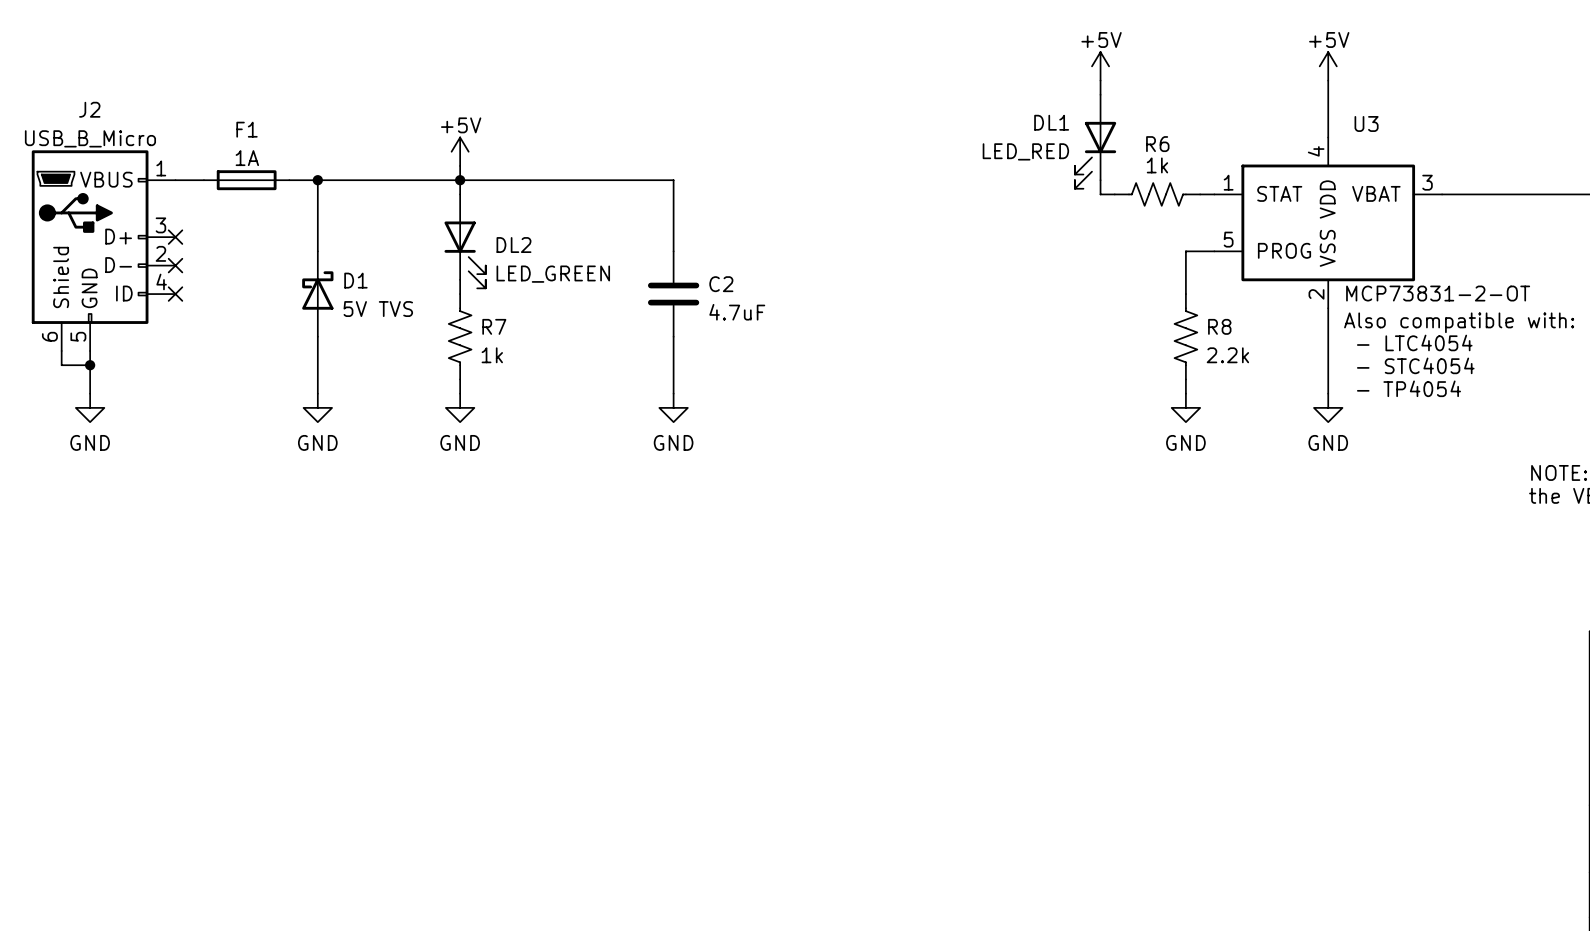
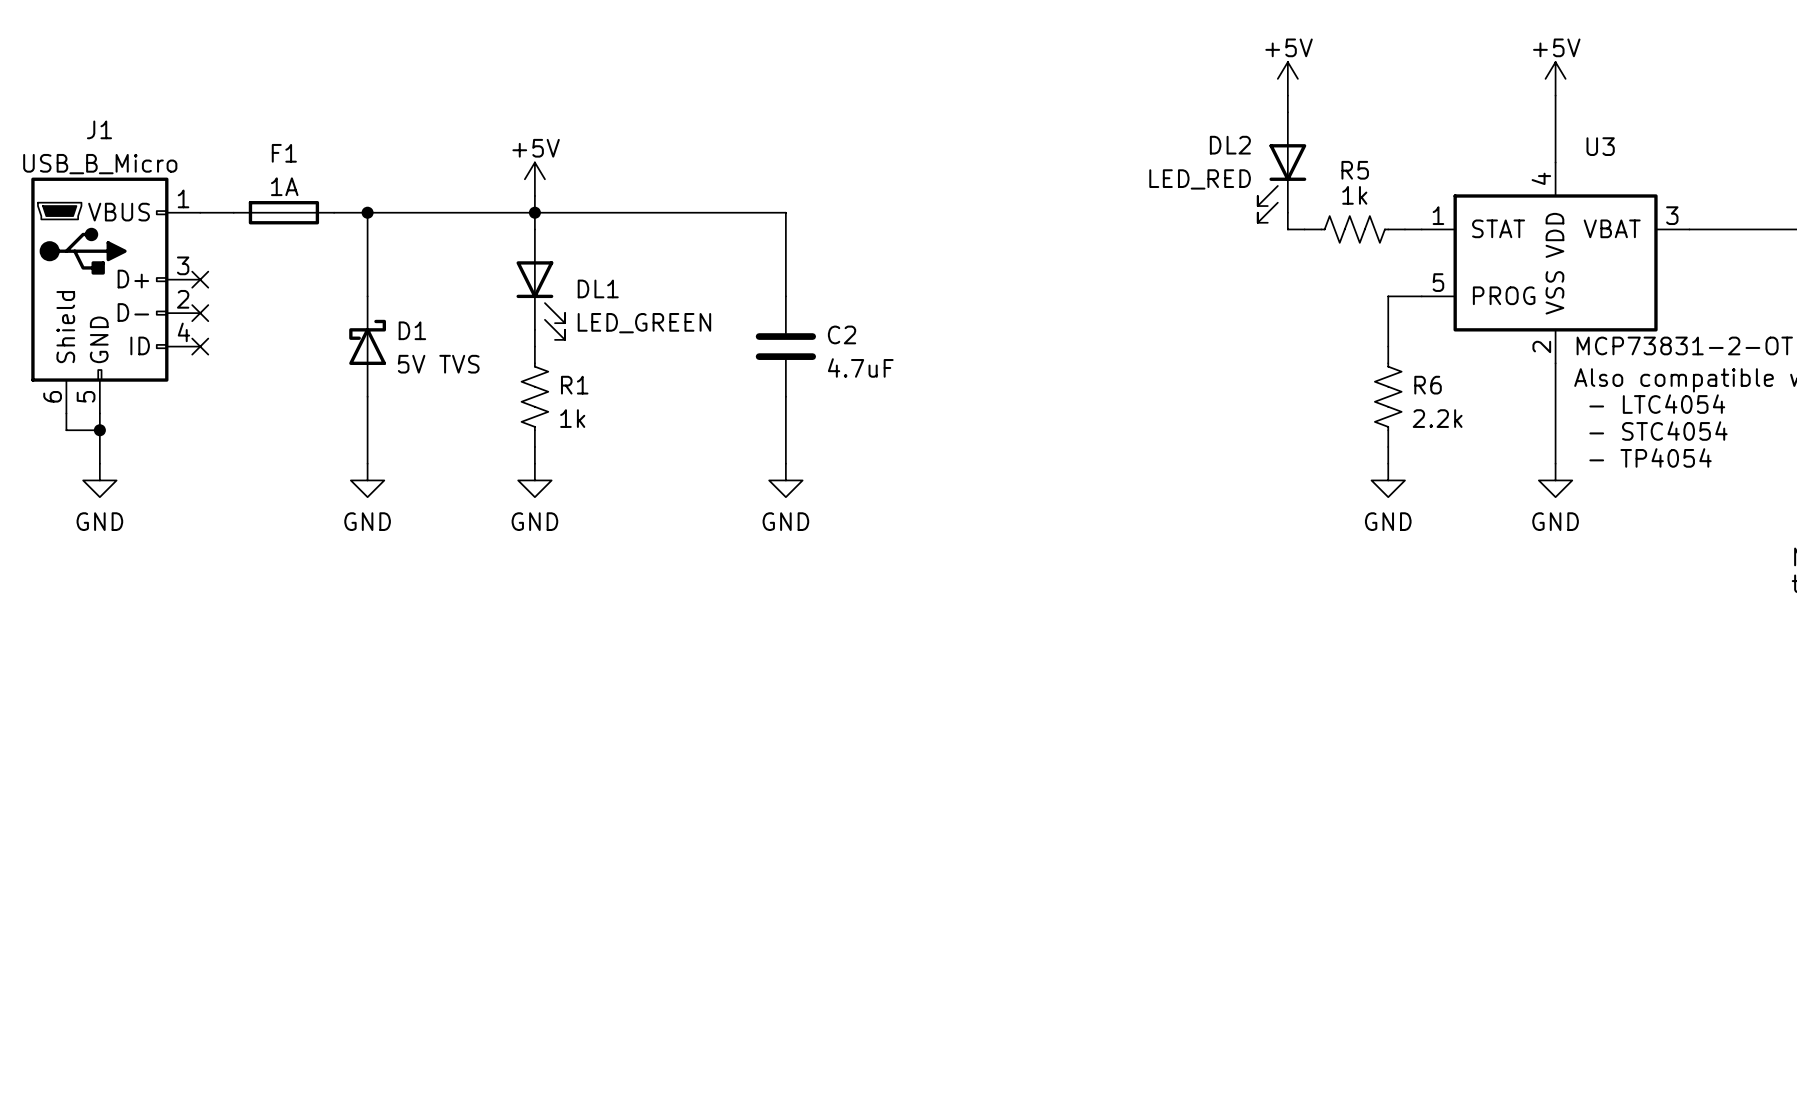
J2 name: J2 (89, 109) -> J1 (99, 129)
DL1 name: DL1 (1051, 122) -> DL2 (1230, 145)
R6 name: R6 (1157, 144) -> R5 (1355, 170)
DL2 name: DL2 (513, 245) -> DL1 (598, 288)
R7 name: R7 (494, 326) -> R1 (574, 385)
R8 name: R8 (1219, 326) -> R6 (1428, 385)

